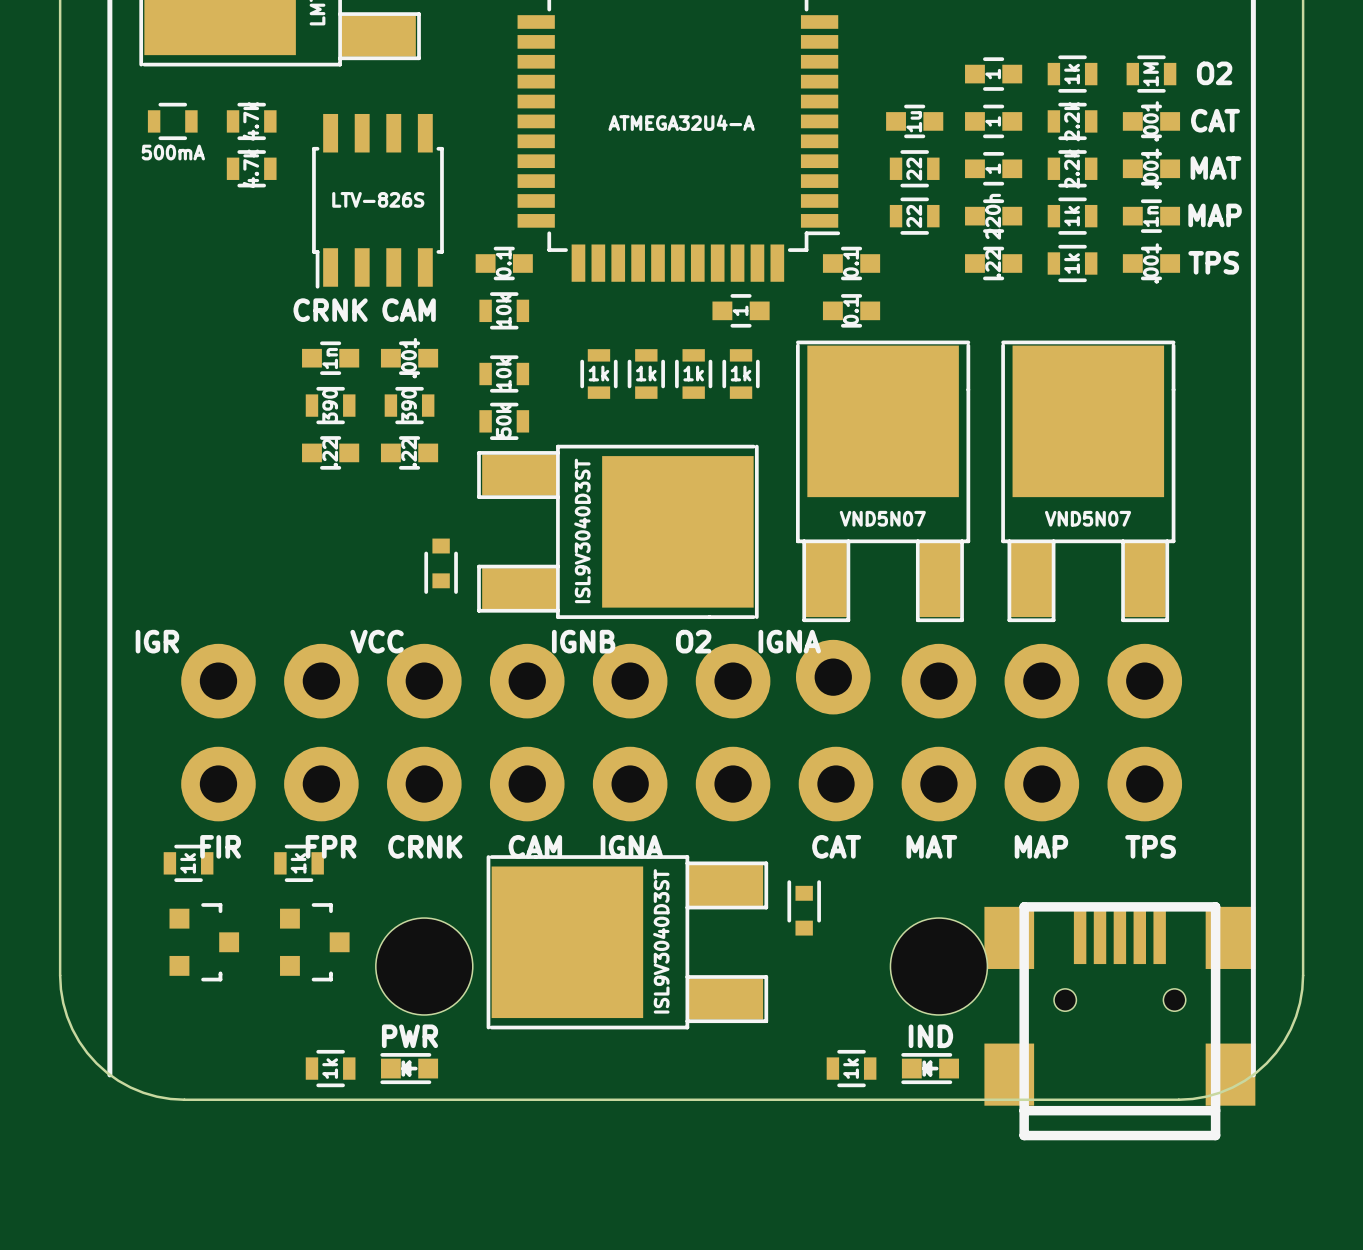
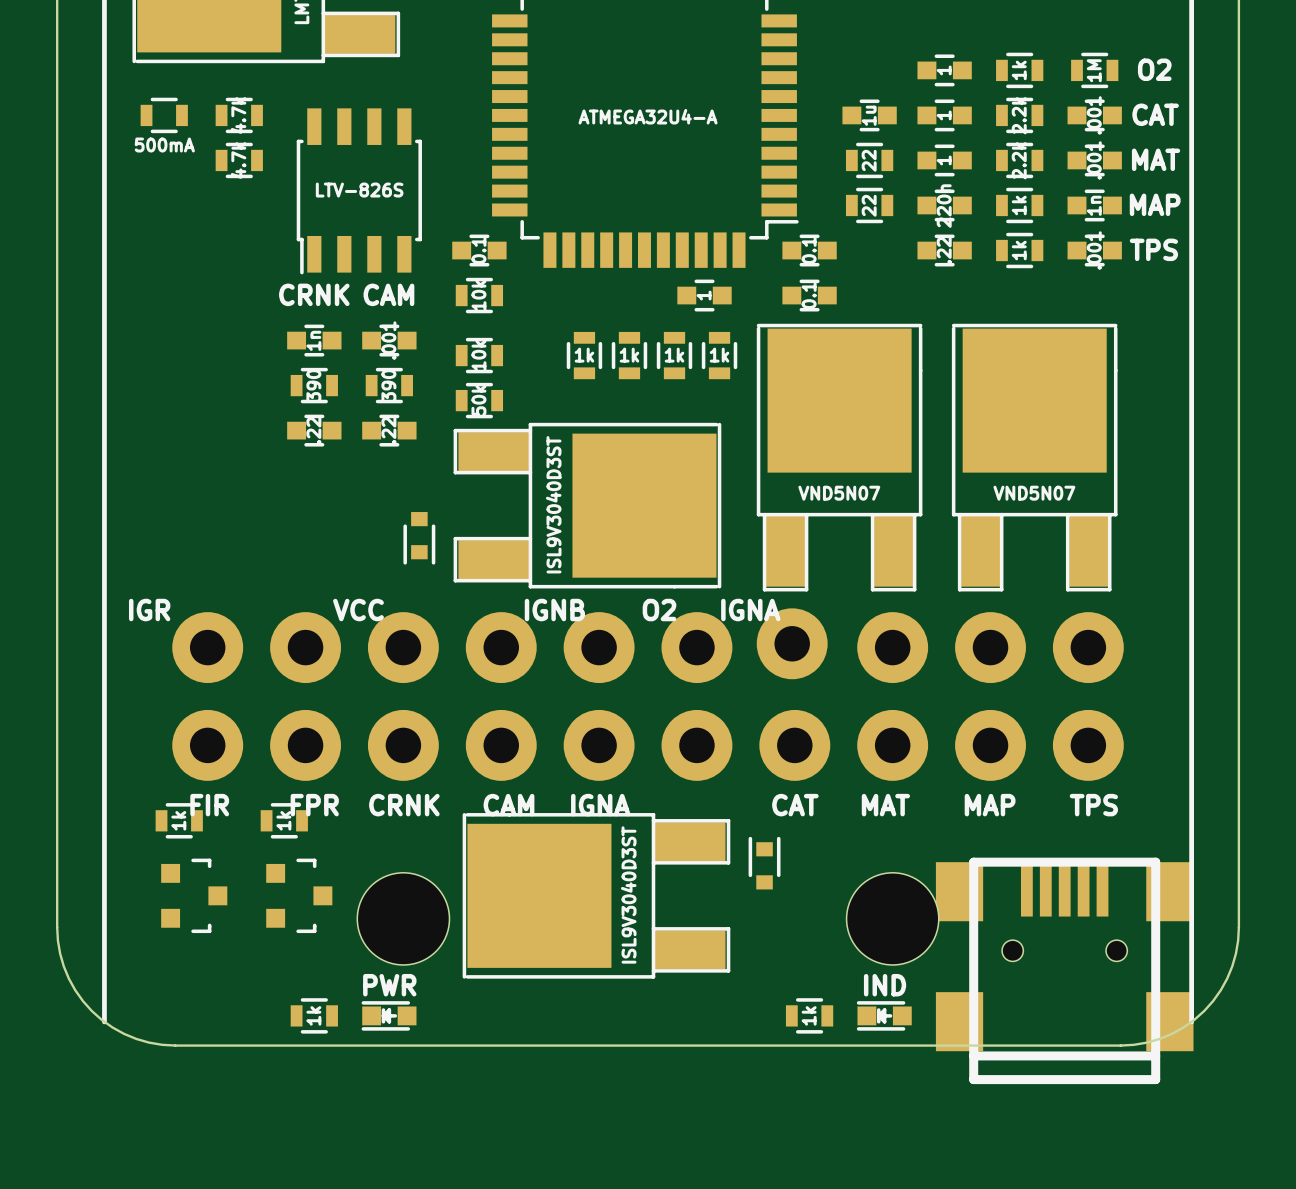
part: 1k (598, 373) -> none
part: none -> 1k (584, 355)
part: 1k (646, 373) -> none
part: none -> 1k (629, 355)
part: 1k (693, 373) -> none
part: none -> 1k (674, 355)
part: 1k (741, 373) -> none
part: none -> 1k (719, 355)

